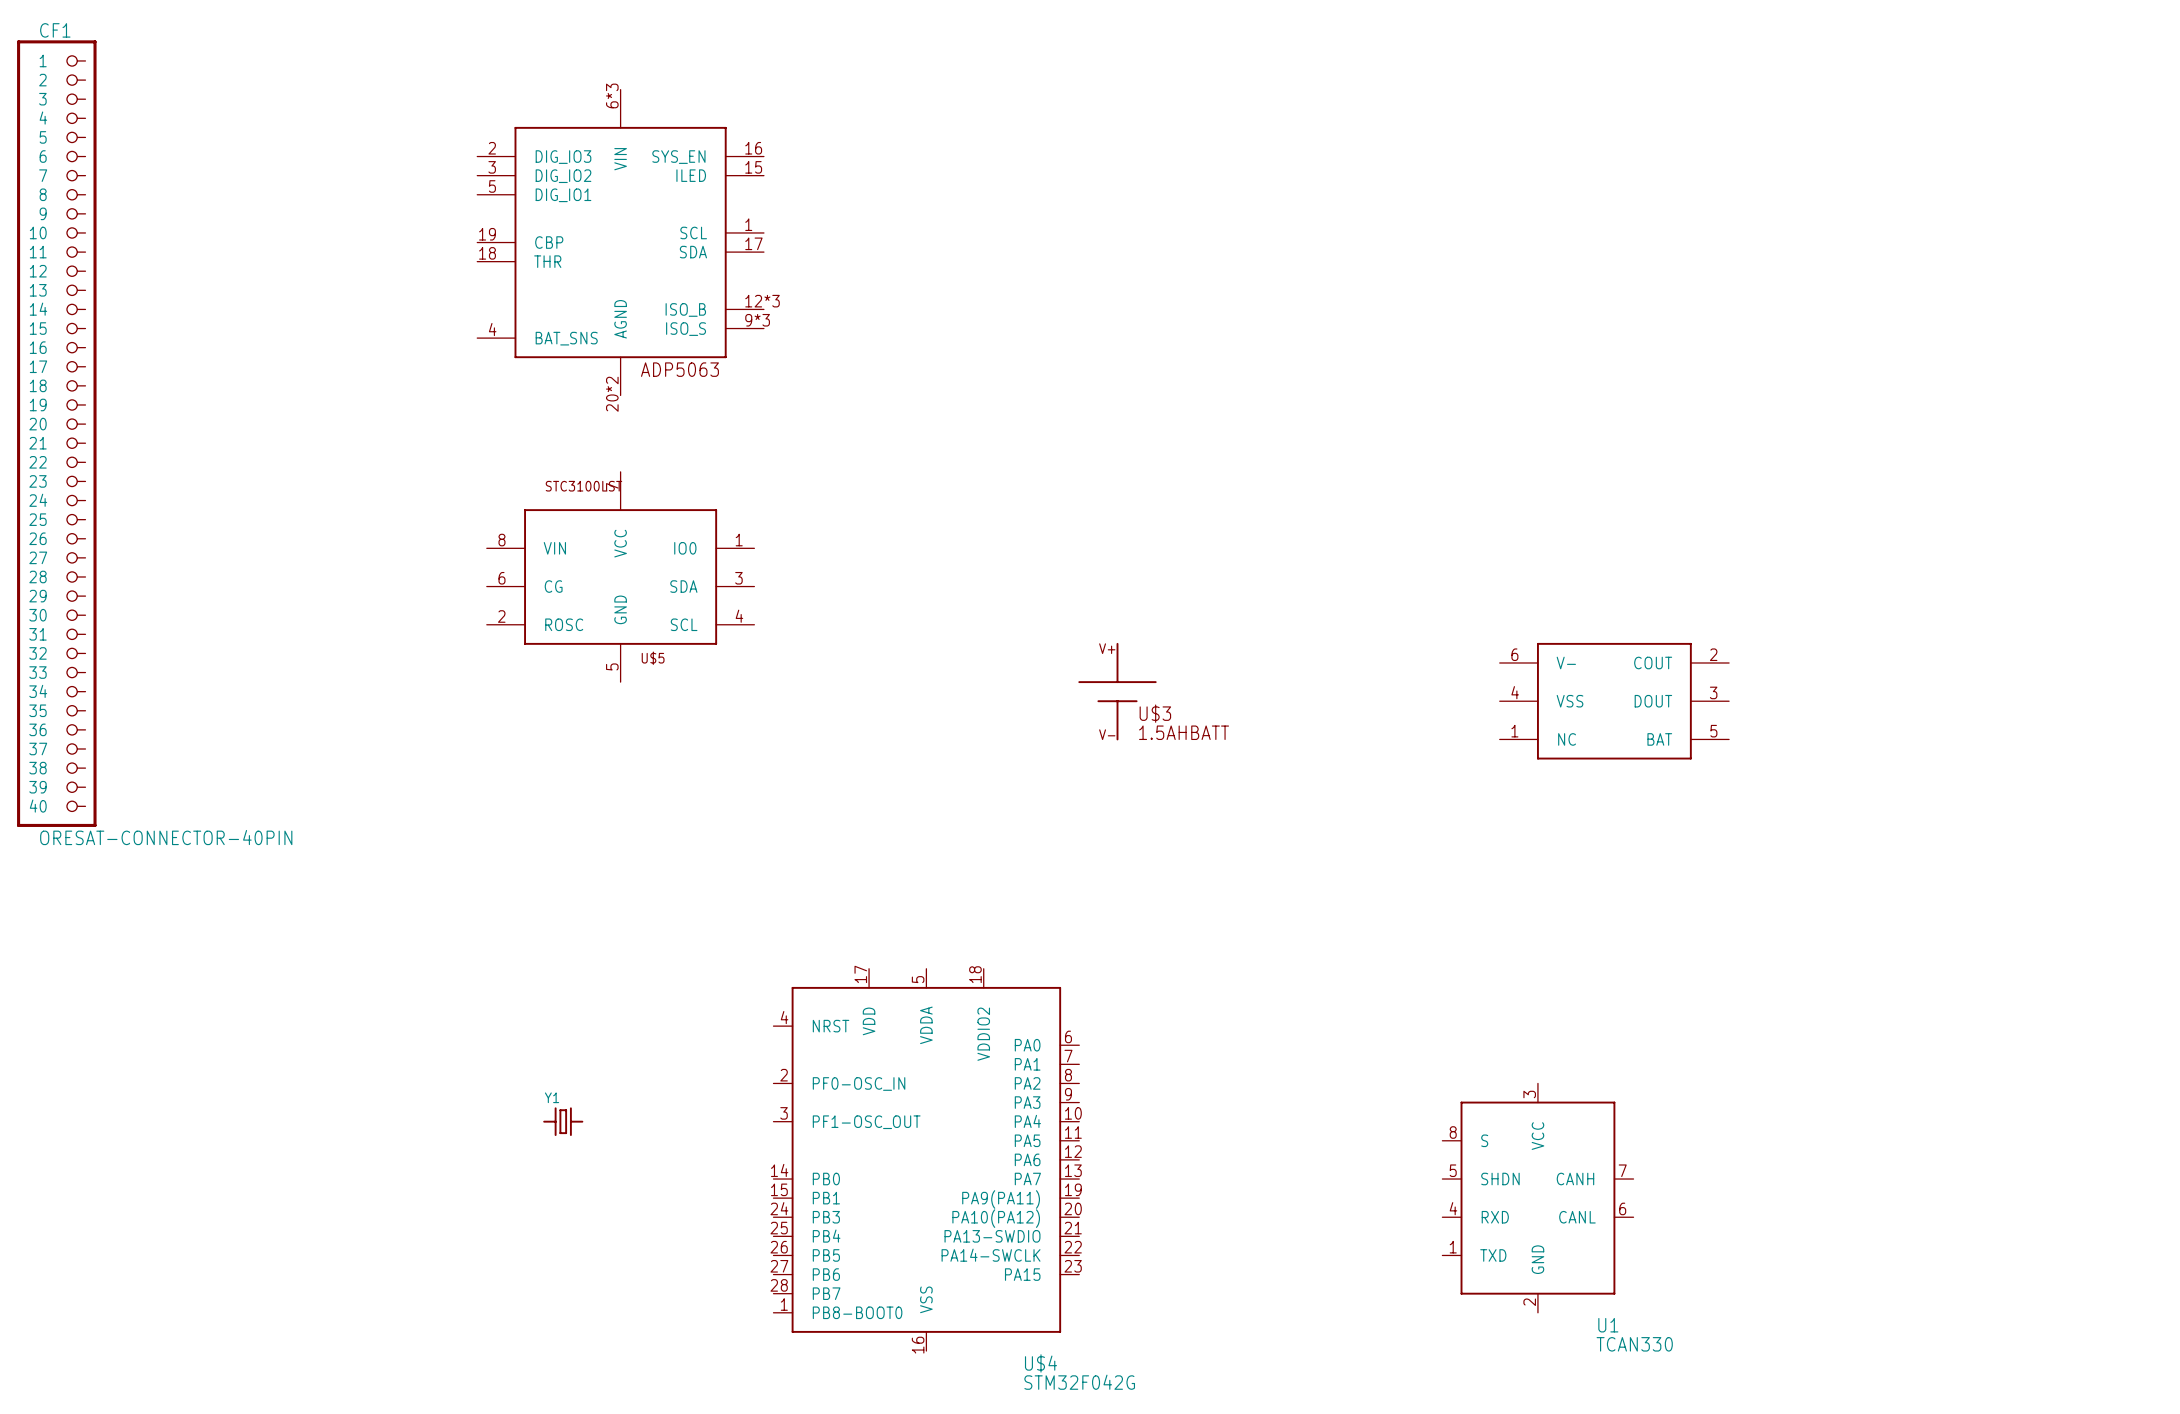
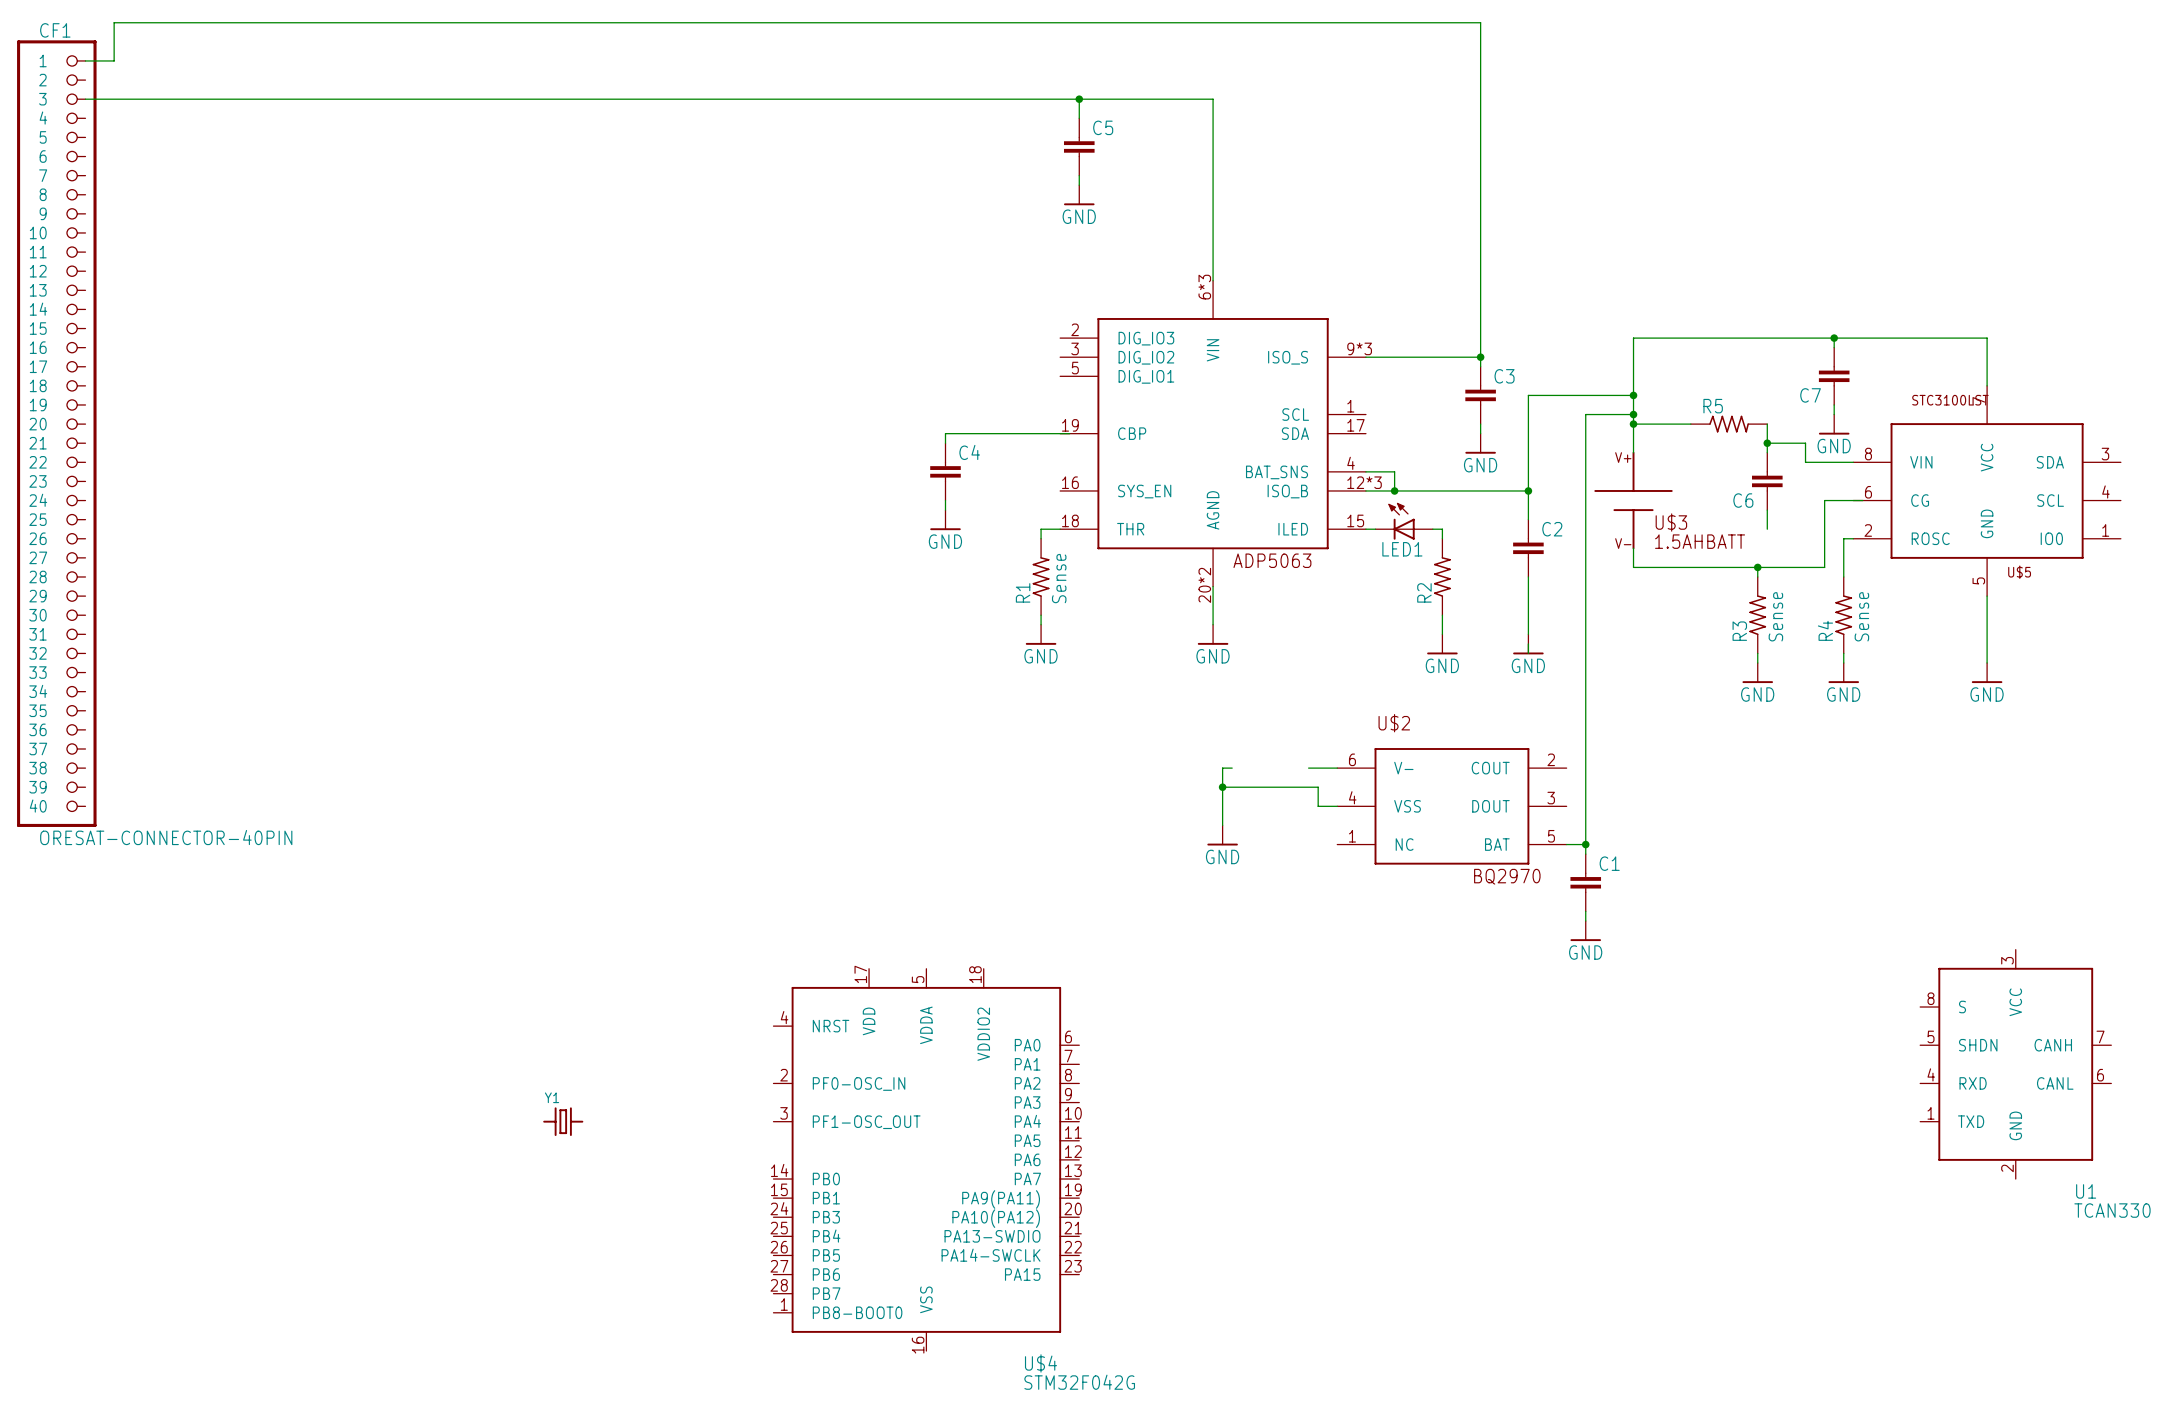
wire: none -> (85, 60) (114, 60) (114, 22) (1480, 22) (1480, 366)
wire: none -> (85, 99) (1213, 99) (1213, 280)
wire: none -> (1079, 99) (1079, 118)
junction: none -> (1079, 99)
C5: none -> (1079, 146)
wire: none -> (1079, 175) (1079, 185)
power symbol: none -> GND (1079, 195)
part: (620, 242) -> none
wire: none -> (1834, 338) (1834, 347)
junction: none -> (1834, 338)
wire: none -> (1365, 357) (1480, 357)
junction: none -> (1480, 357)
C7: none -> (1834, 376)
wire: none -> (1987, 385) (1987, 338) (1633, 338) (1633, 452)
C3: none -> (1480, 395)
wire: none -> (1633, 395) (1528, 395) (1528, 519)
junction: none -> (1633, 395)
wire: none -> (1834, 404) (1834, 414)
wire: none -> (1633, 414) (1585, 414) (1585, 854)
junction: none -> (1633, 414)
wire: none -> (1480, 424) (1480, 433)
wire: none -> (1633, 424) (1690, 424)
junction: none -> (1633, 424)
R5: none -> (1729, 424)
wire: none -> (1767, 424) (1767, 452)
power symbol: none -> GND (1834, 424)
wire: none -> (1069, 433) (945, 433) (945, 443)
part: none -> (1213, 433)
power symbol: none -> GND (1480, 443)
wire: none -> (1767, 443) (1805, 443) (1805, 462) (1853, 462)
junction: none -> (1767, 443)
C4: none -> (945, 471)
wire: none -> (1365, 471) (1394, 471) (1394, 490)
C6: none -> (1767, 481)
wire: none -> (1365, 490) (1528, 490)
junction: none -> (1394, 490)
junction: none -> (1528, 490)
wire: none -> (945, 500) (945, 510)
wire: none -> (1862, 500) (1824, 500) (1824, 567) (1633, 567) (1633, 548)
wire: none -> (1767, 510) (1767, 529)
power symbol: none -> GND (945, 520)
LED1: none -> (1404, 521)
wire: none -> (1060, 529) (1041, 529) (1041, 538)
wire: none -> (1365, 529) (1375, 529)
wire: none -> (1432, 529) (1442, 529) (1442, 538)
wire: none -> (1853, 538) (1843, 538) (1843, 576)
U$5 pin number: 1 (739, 540) -> 3 (2105, 454)
U$5 pin name: IO0 (685, 548) -> SDA (2050, 462)
C2: none -> (1528, 548)
wire: none -> (1757, 567) (1757, 576)
junction: none -> (1757, 567)
U$5 position: (620, 576) -> (1987, 490)
R1: none -> Sense (1041, 576)
R2: none -> (1442, 576)
wire: none -> (1528, 576) (1528, 634)
U$5 pin number: 3 (738, 578) -> 4 (2105, 491)
U$5 pin name: SDA (683, 586) -> SCL (2050, 500)
wire: none -> (1213, 586) (1213, 624)
wire: none -> (1987, 596) (1987, 662)
wire: none -> (1041, 615) (1041, 624)
wire: none -> (1442, 615) (1442, 634)
R3: none -> Sense (1757, 615)
R4: none -> Sense (1843, 615)
U$5 pin number: 4 (739, 616) -> 1 (2105, 530)
U$5 pin name: SCL (684, 624) -> IO0 (2051, 538)
power symbol: none -> GND (1041, 634)
power symbol: none -> GND (1213, 634)
wire: none -> (1528, 643) (1528, 653)
power symbol: none -> GND (1442, 644)
power symbol: none -> GND (1528, 644)
wire: none -> (1757, 653) (1757, 662)
wire: none -> (1843, 653) (1843, 662)
power symbol: none -> GND (1757, 673)
power symbol: none -> GND (1843, 673)
power symbol: none -> GND (1987, 673)
U$3 position: (1117, 691) -> (1633, 500)
part: (1614, 701) -> none
wire: none -> (1232, 768) (1222, 768) (1222, 825)
wire: none -> (1308, 768) (1337, 768)
wire: none -> (1222, 787) (1318, 787) (1318, 806) (1337, 806)
junction: none -> (1222, 787)
U$2: none -> BQ2970 (1451, 806)
power symbol: none -> GND (1222, 835)
wire: none -> (1566, 844) (1585, 844)
junction: none -> (1585, 844)
C1: none -> (1585, 882)
wire: none -> (1585, 911) (1585, 921)
power symbol: none -> GND (1585, 931)
U1 position: (1537, 1198) -> (2015, 1064)

